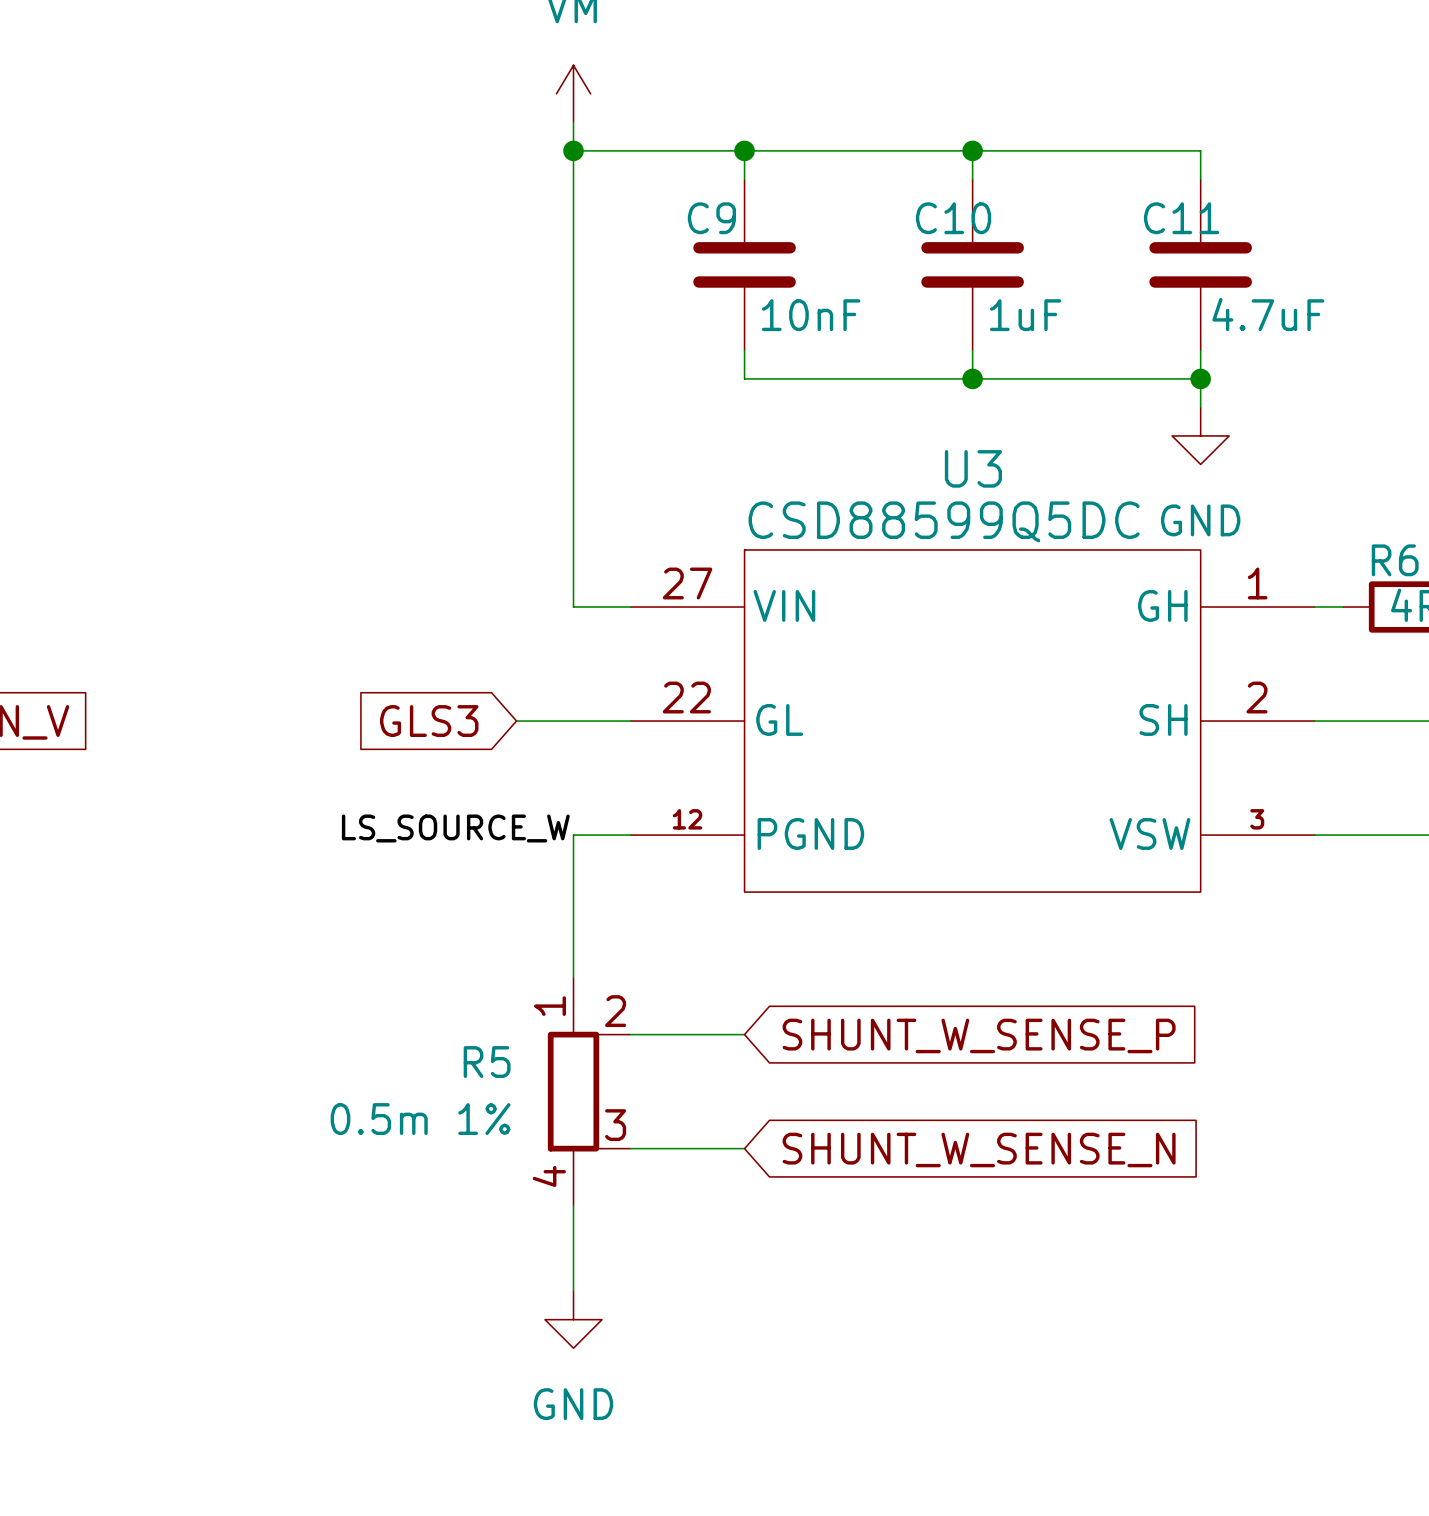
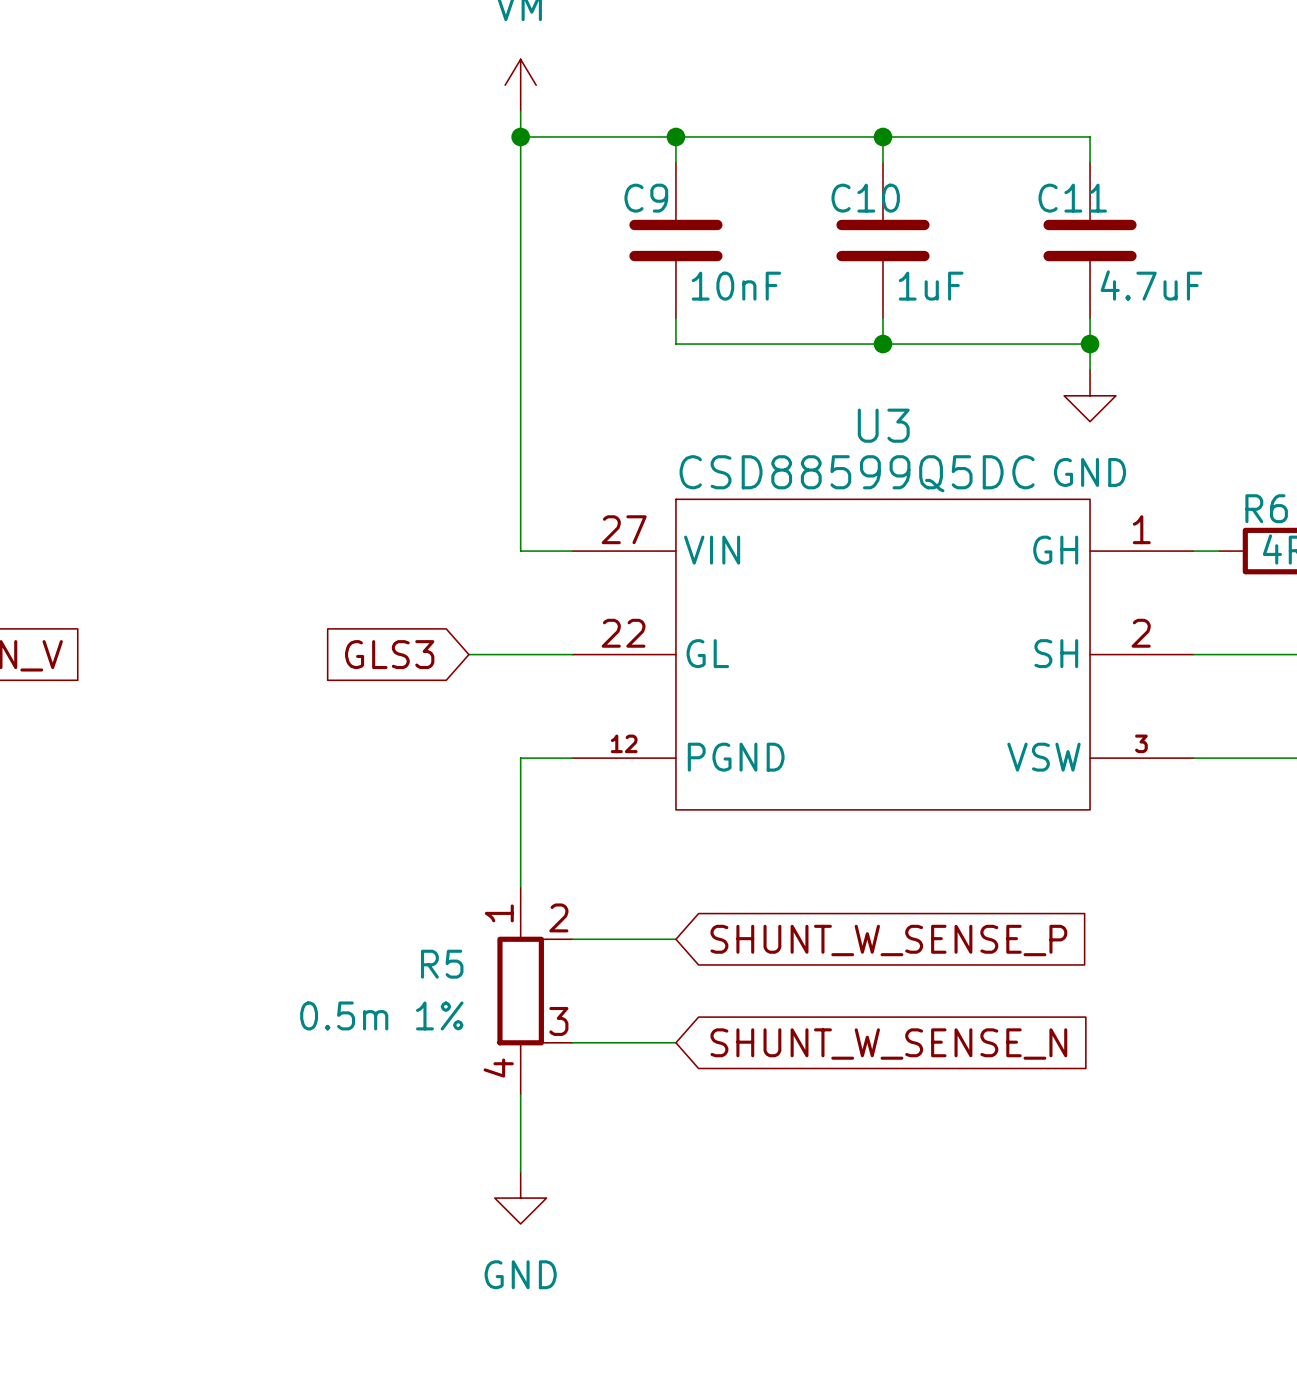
label: LS_SOURCE_W (455, 828) -> none

